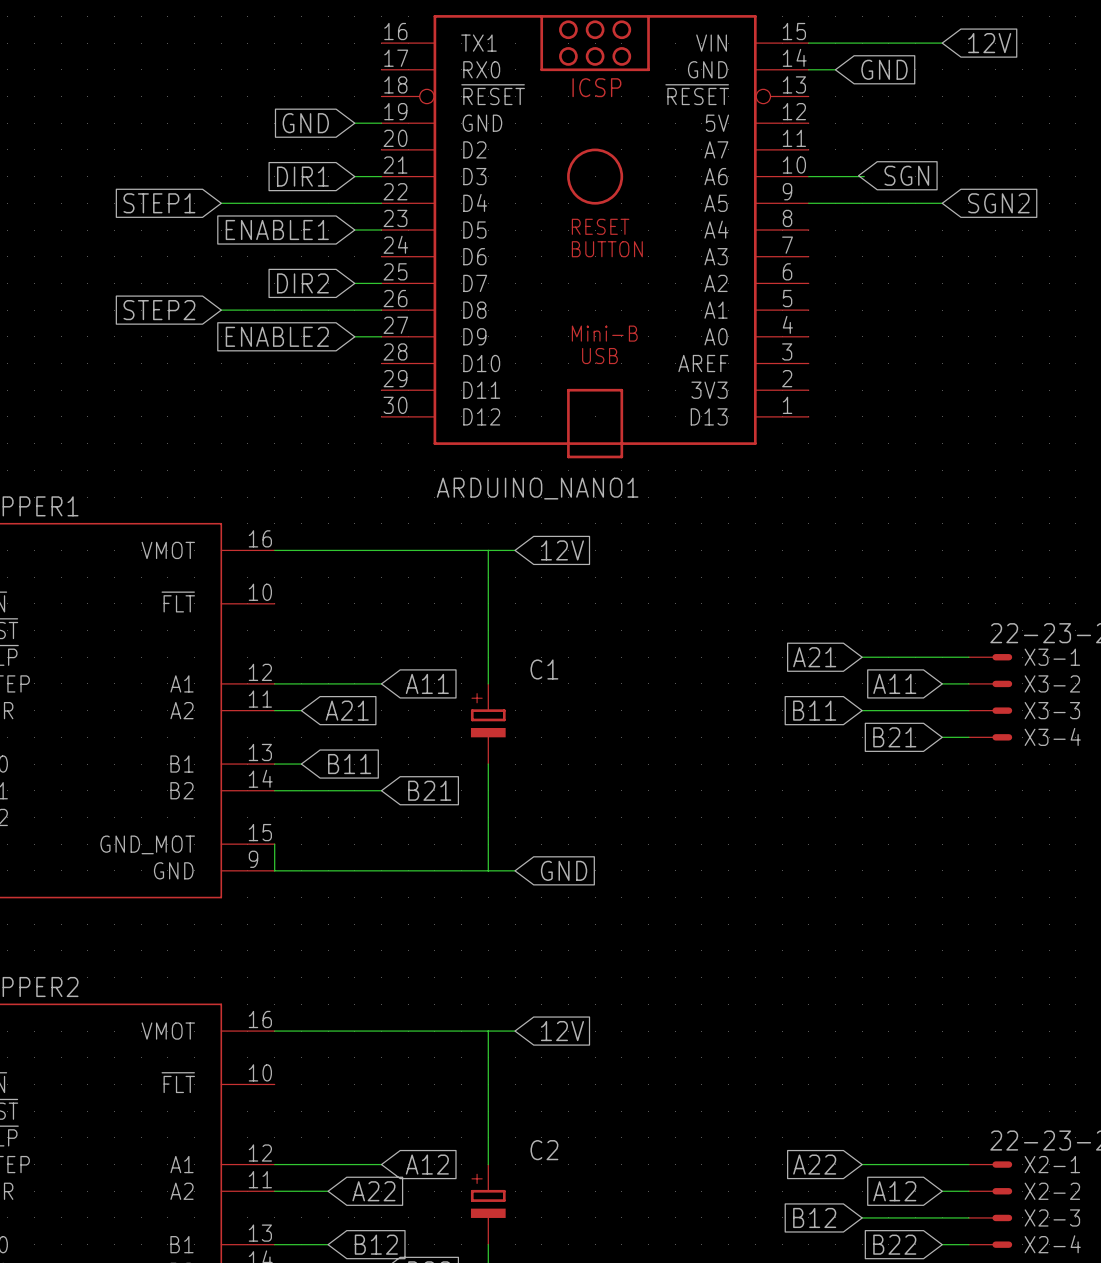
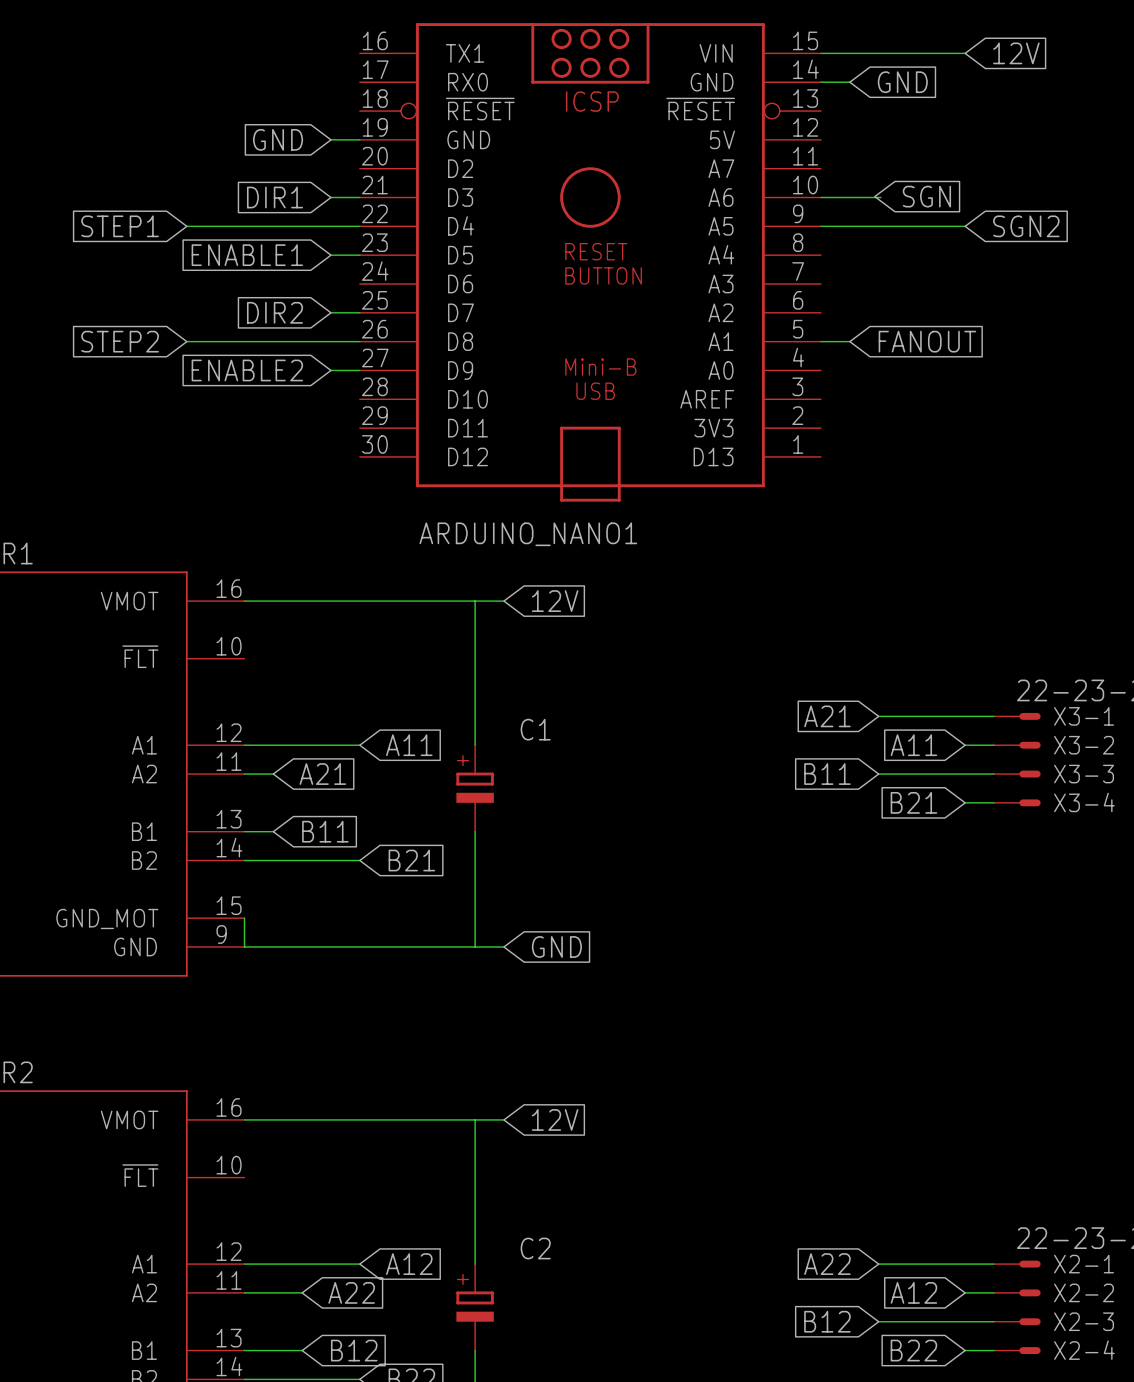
wire: none -> (821, 341) (849, 341)
global label: none -> FANOUT (927, 341)

